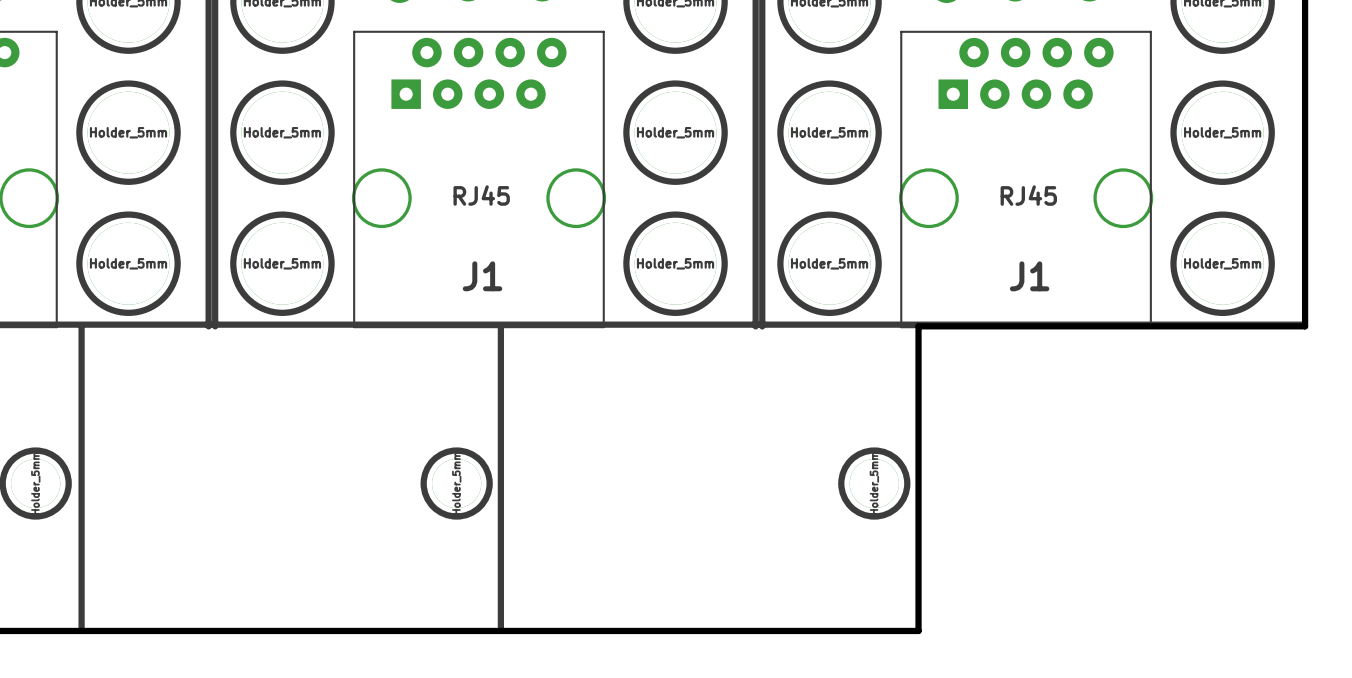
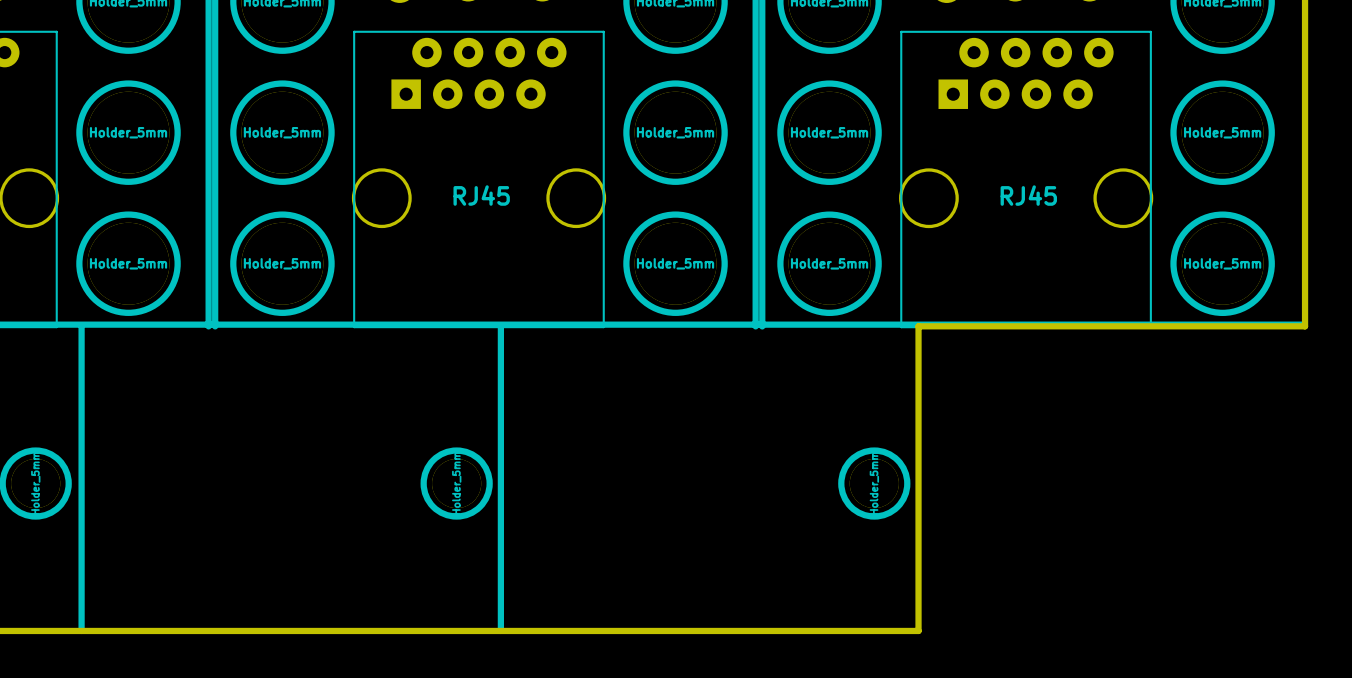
J1 name: J1 (482, 276) -> none
J1 name: J1 (1029, 276) -> none

